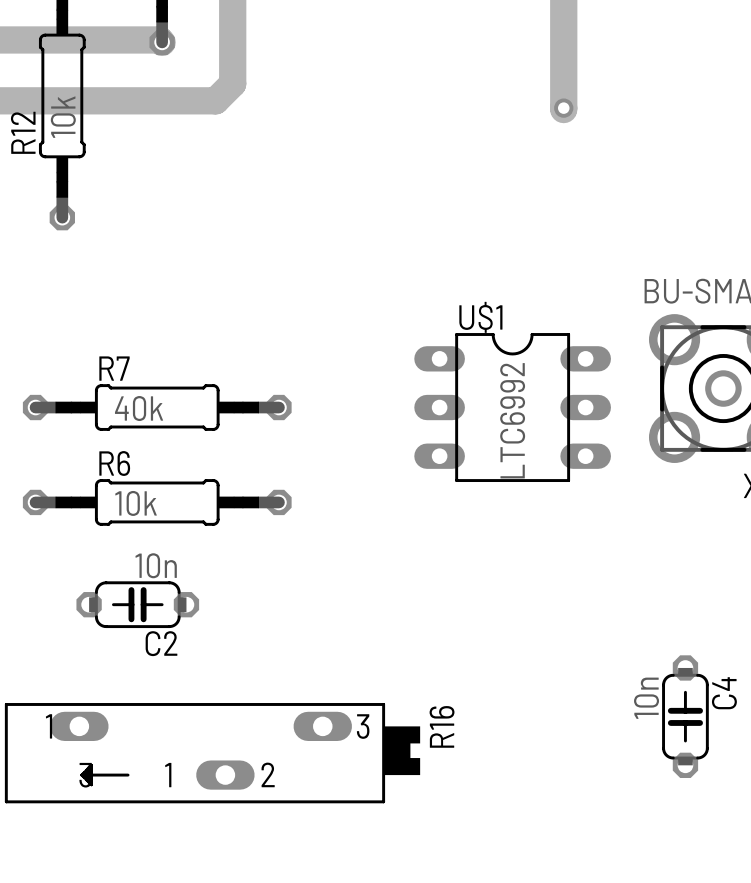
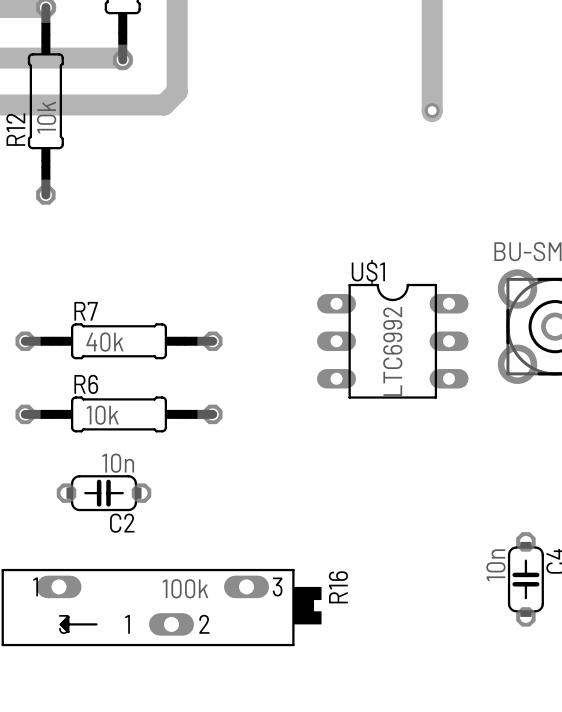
R16 value: none -> 100k (185, 588)

